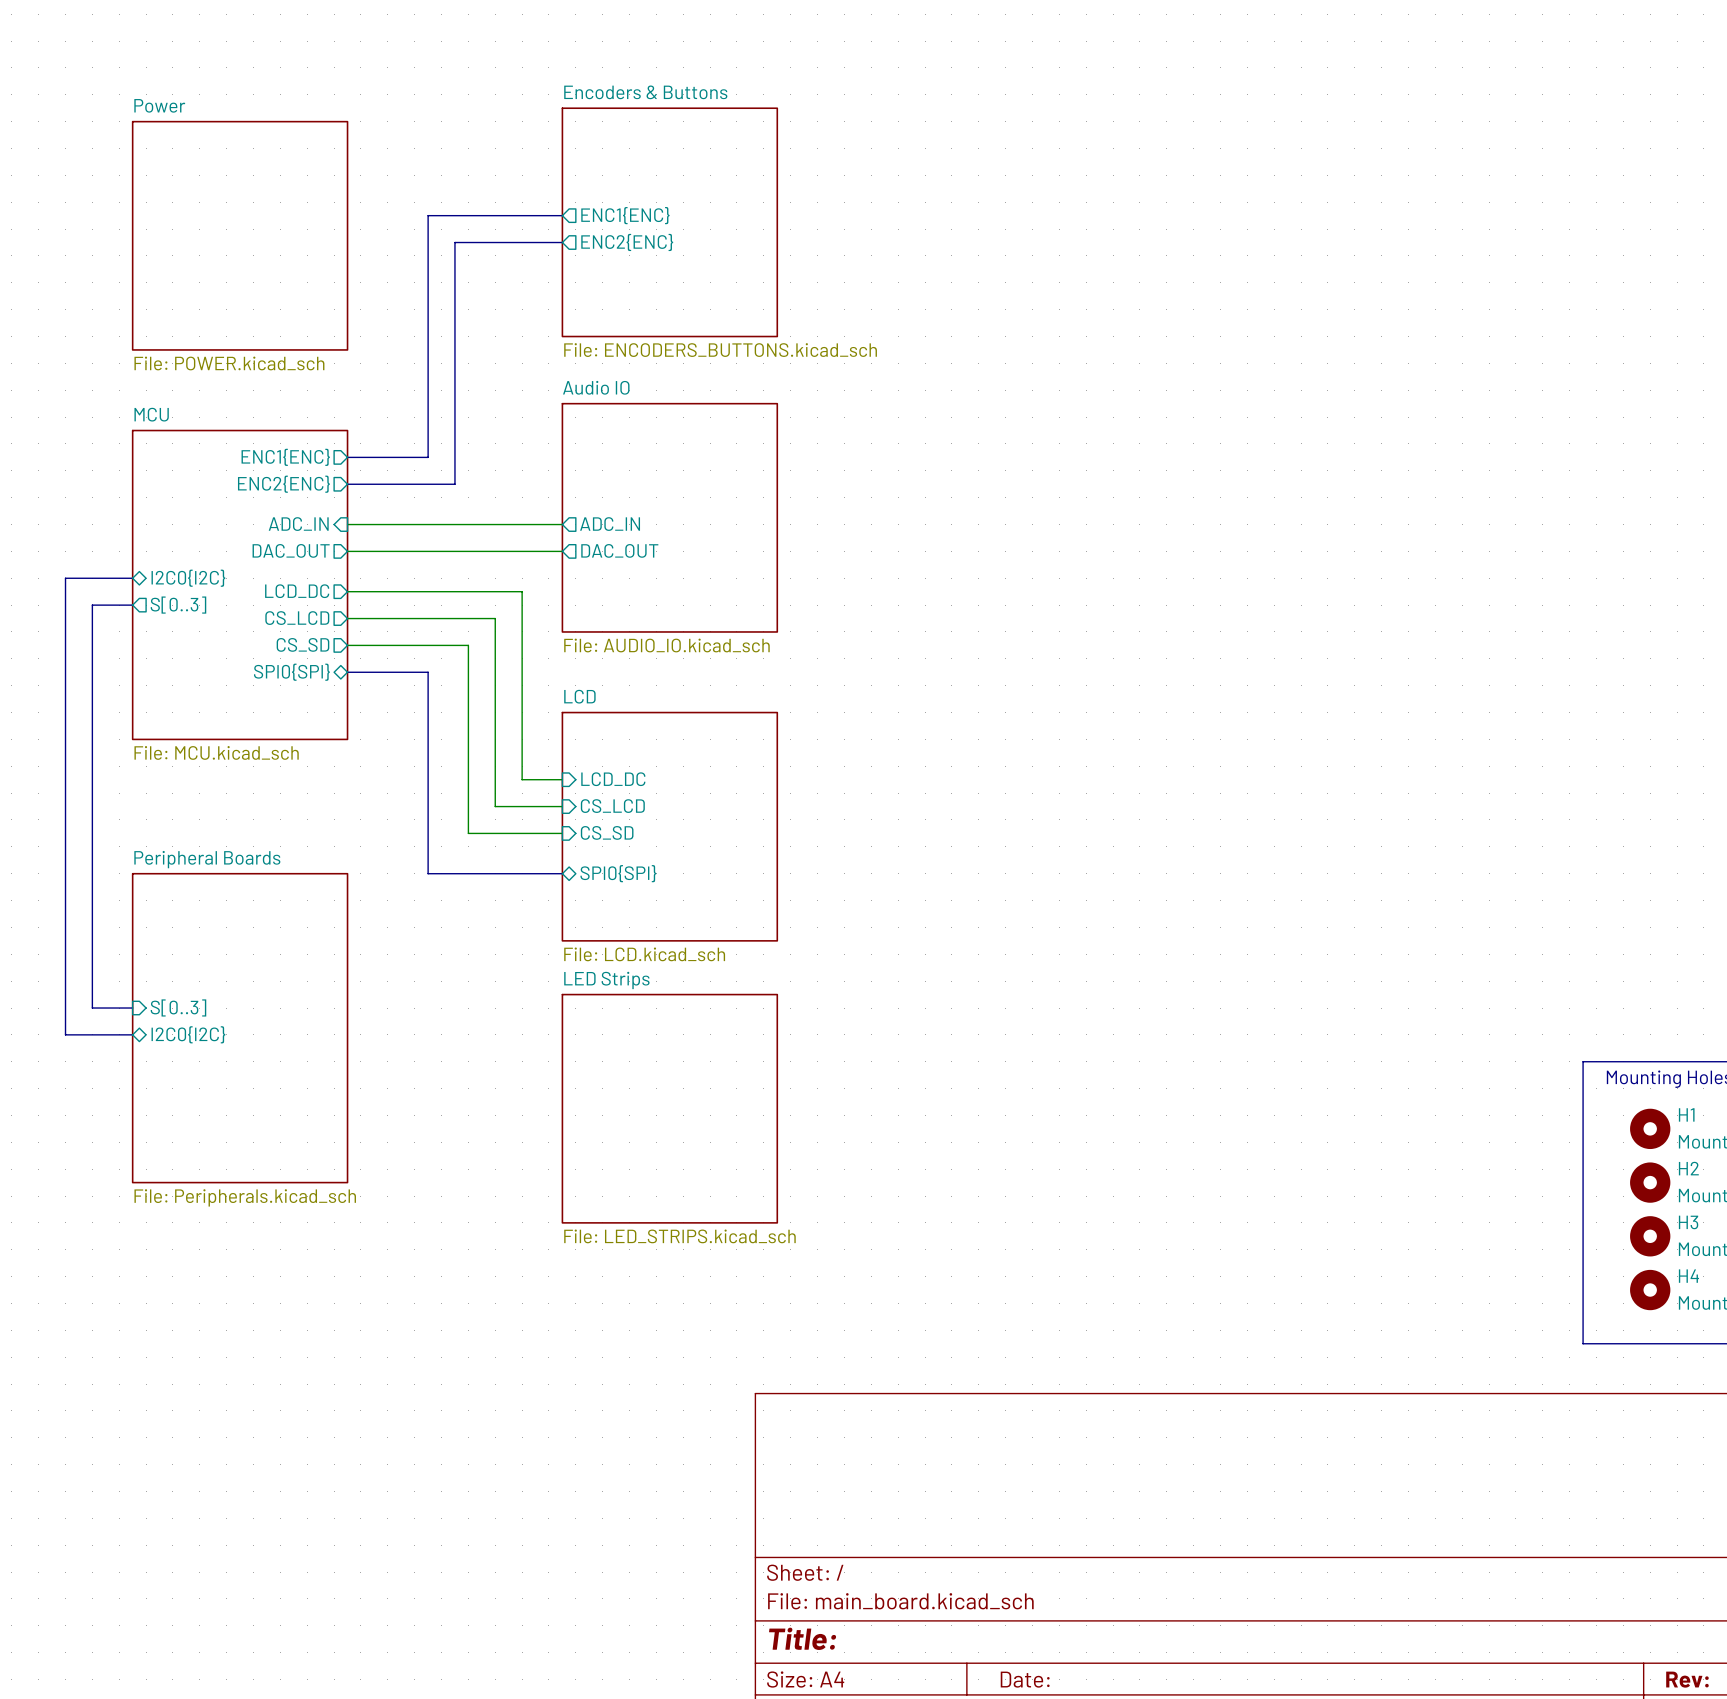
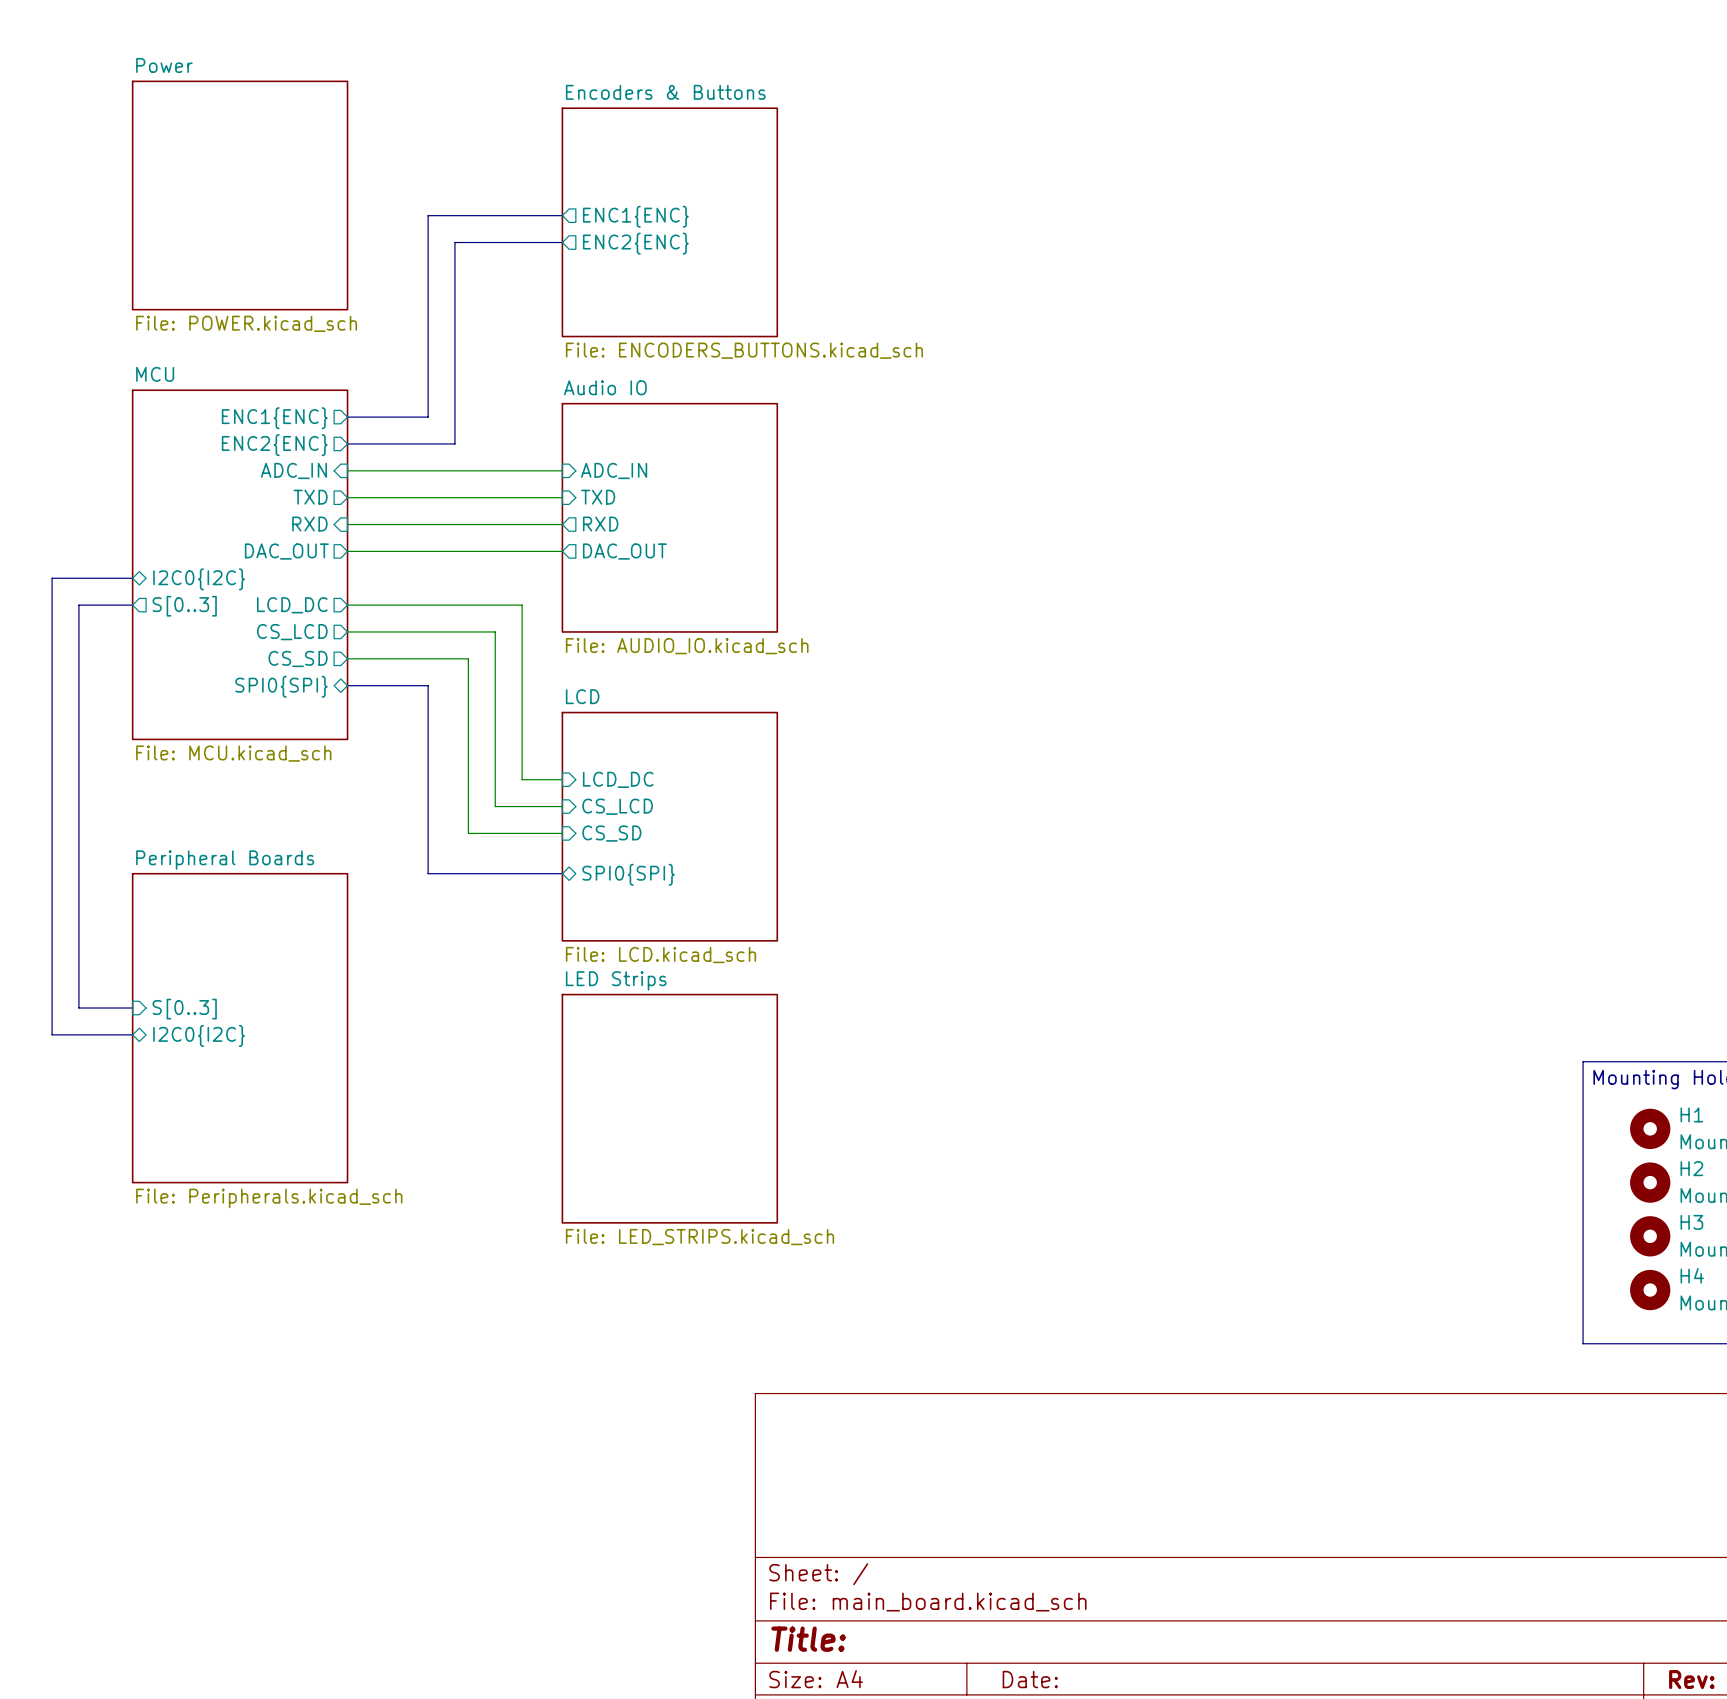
sheet Power position: (240, 235) -> (240, 195)
bus: (428, 417) (428, 457) (347, 457) -> (428, 417) (347, 417)
bus: (454, 443) (454, 484) (347, 484) -> (454, 443) (347, 443)
sheet pin position: ENC1{ENC} (285, 457) -> ENC1{ENC} (274, 418)
sheet pin: none -> ADC_IN (293, 470)
wire: none -> (347, 470) (562, 470)
sheet pin: none -> ADC_IN (614, 470)
sheet pin position: ENC2{ENC} (283, 484) -> ENC2{ENC} (274, 445)
sheet pin: none -> TXD (310, 497)
wire: none -> (347, 497) (562, 497)
sheet pin: none -> TXD (598, 497)
sheet pin: ADC_IN (298, 524) -> RXD (309, 524)
sheet pin: ADC_IN (610, 524) -> RXD (600, 524)
sheet MCU: none -> File: MCU.kicad_sch (240, 564)
bus: (65, 578) (65, 1034) -> (65, 578) (52, 578) (52, 1034) (65, 1034)
sheet MCU: File: MCU.kicad_sch (240, 584) -> none
sheet pin position: LCD_DC (297, 591) -> LCD_DC (292, 605)
wire: (347, 591) (522, 591) (522, 605) -> (347, 605) (522, 605)
bus: (92, 605) (92, 1008) -> (92, 605) (78, 605) (78, 1008) (92, 1008)
sheet pin position: CS_LCD (297, 618) -> CS_LCD (292, 632)
wire: (347, 618) (495, 618) (495, 631) -> (347, 631) (495, 631)
sheet pin position: CS_SD (302, 644) -> CS_SD (298, 658)
wire: (347, 645) (468, 645) (468, 658) -> (347, 658) (468, 658)
sheet pin position: SPI0{SPI} (291, 672) -> SPI0{SPI} (281, 686)
bus: (347, 672) (428, 672) (428, 685) -> (347, 685) (428, 685)

